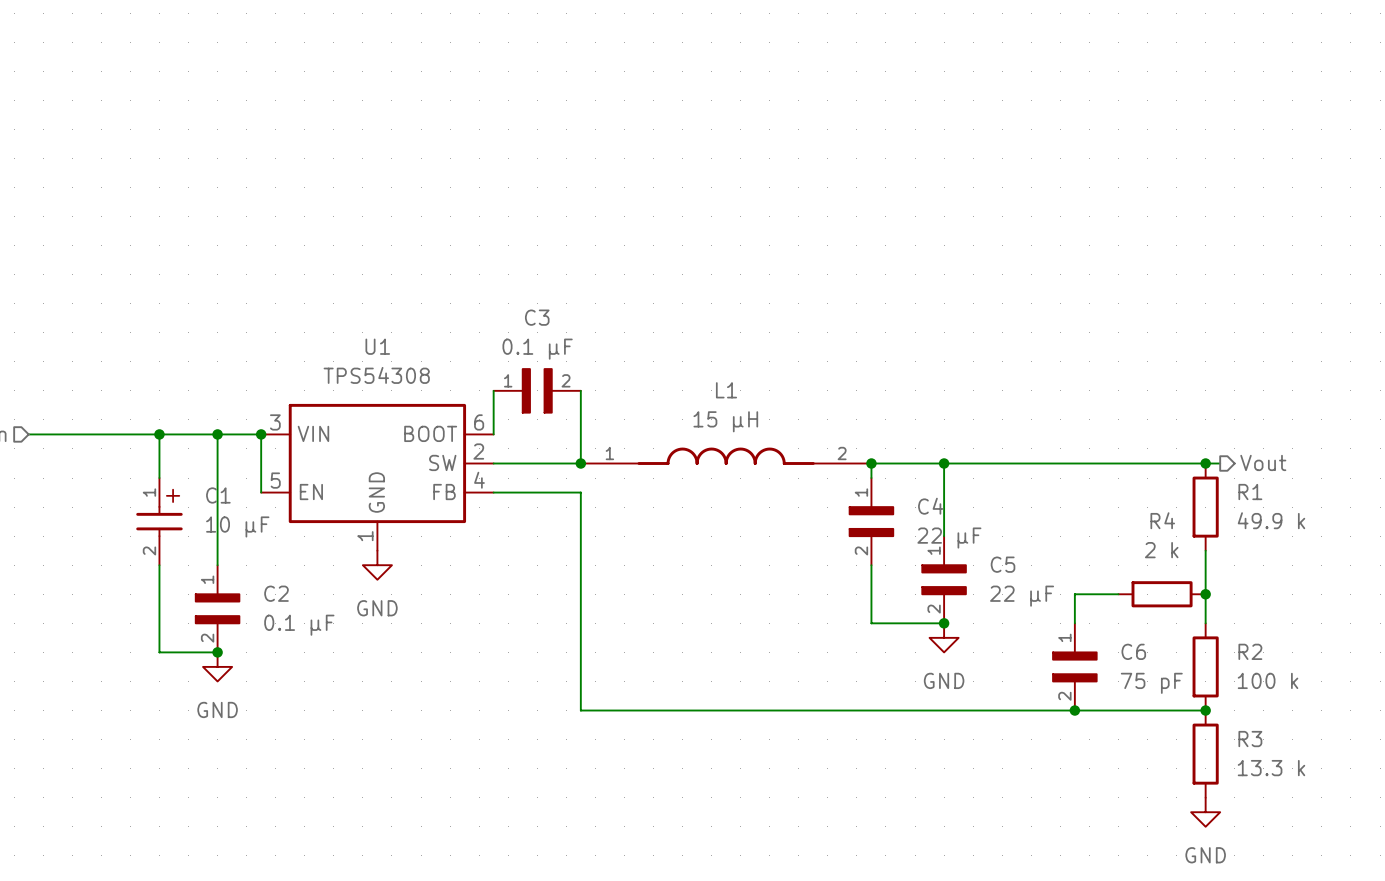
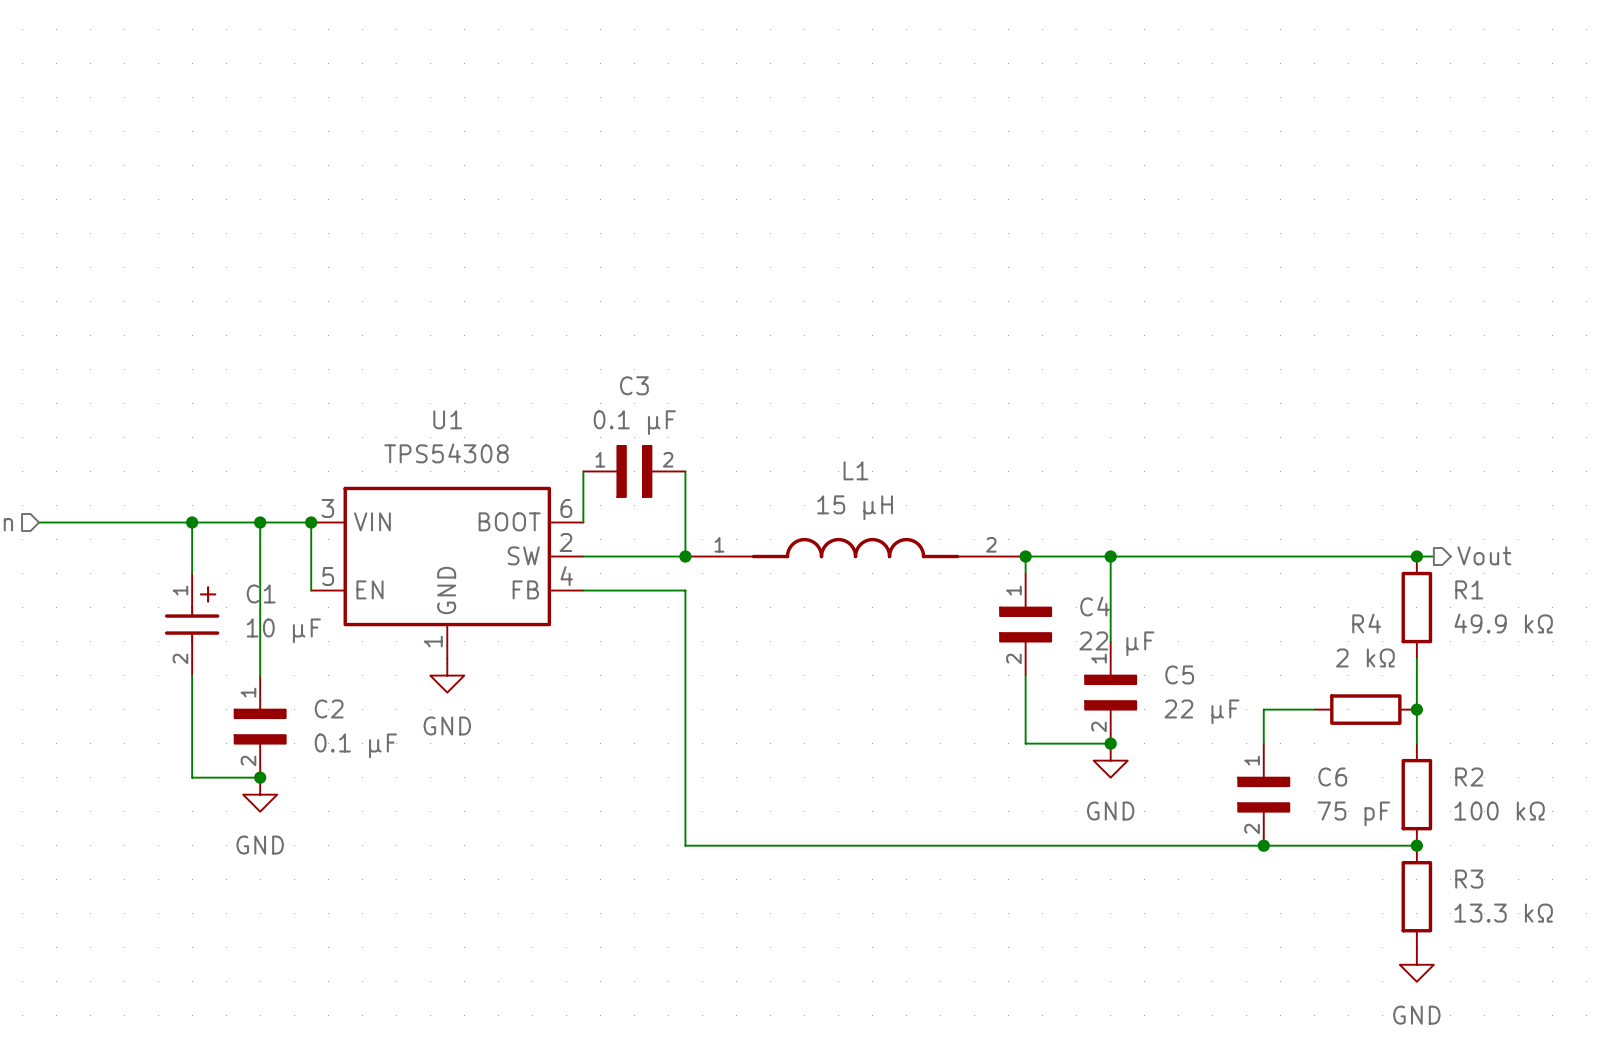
R1 value: 49.9 k (1271, 520) -> 49.9 kΩ (1503, 623)
R4 value: 2 k (1161, 550) -> 2 kΩ (1365, 657)
R2 value: 100 k (1268, 680) -> 100 kΩ (1499, 811)
R3 value: 13.3 k (1271, 768) -> 13.3 kΩ (1503, 913)

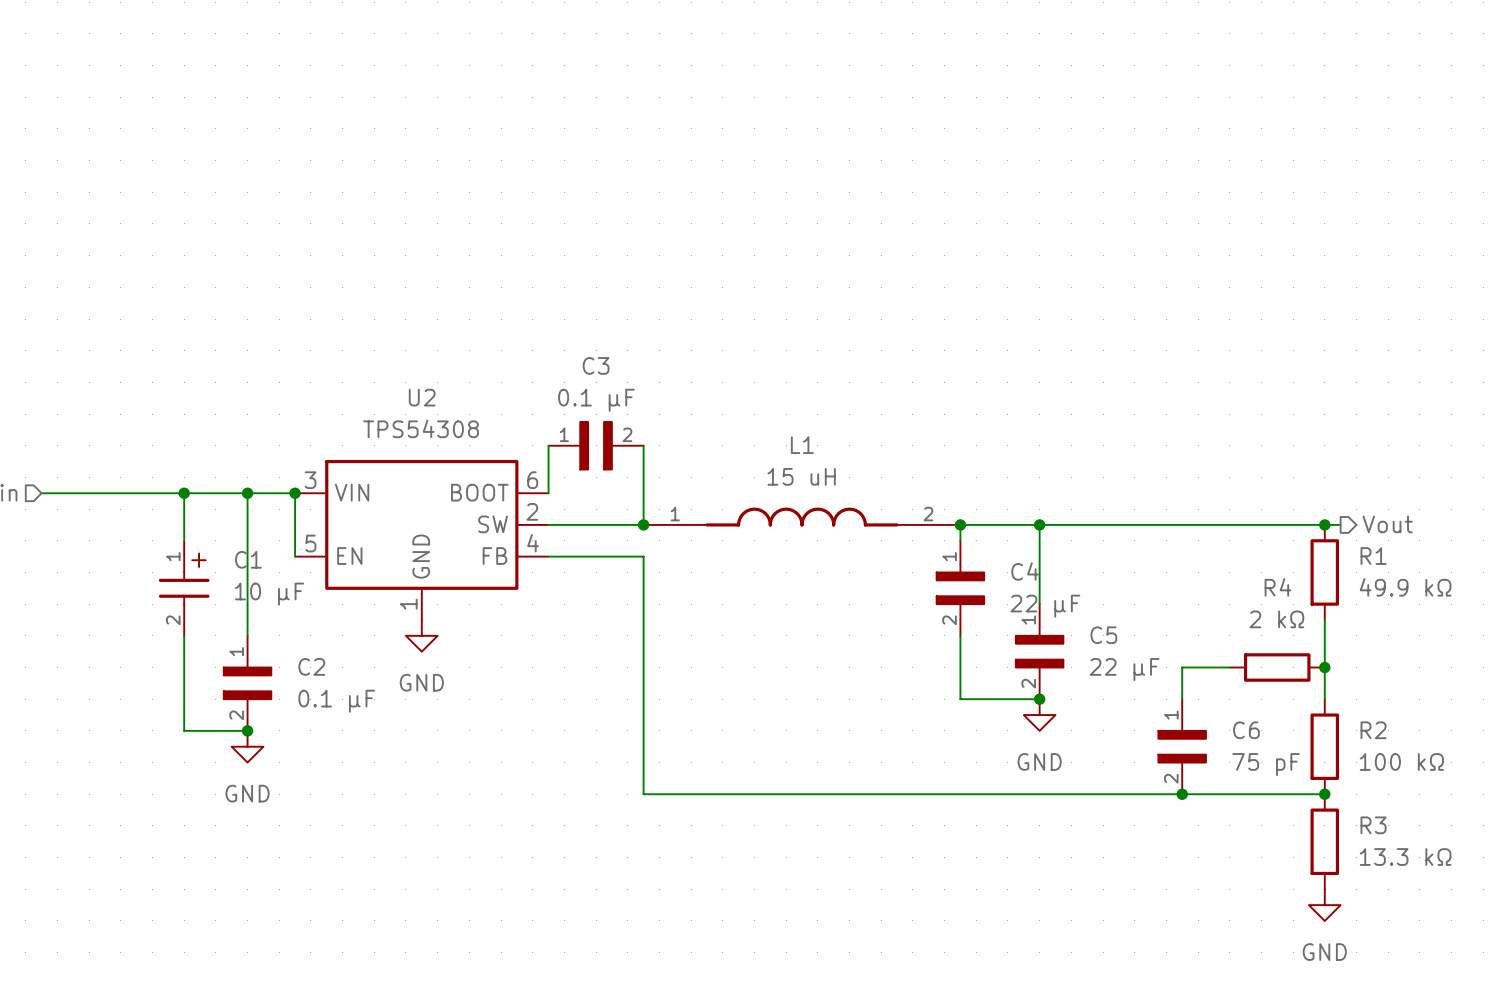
U1 name: U1 (447, 419) -> U2 (422, 397)
L1 value: 15 µH (855, 507) -> 15 uH (801, 476)

